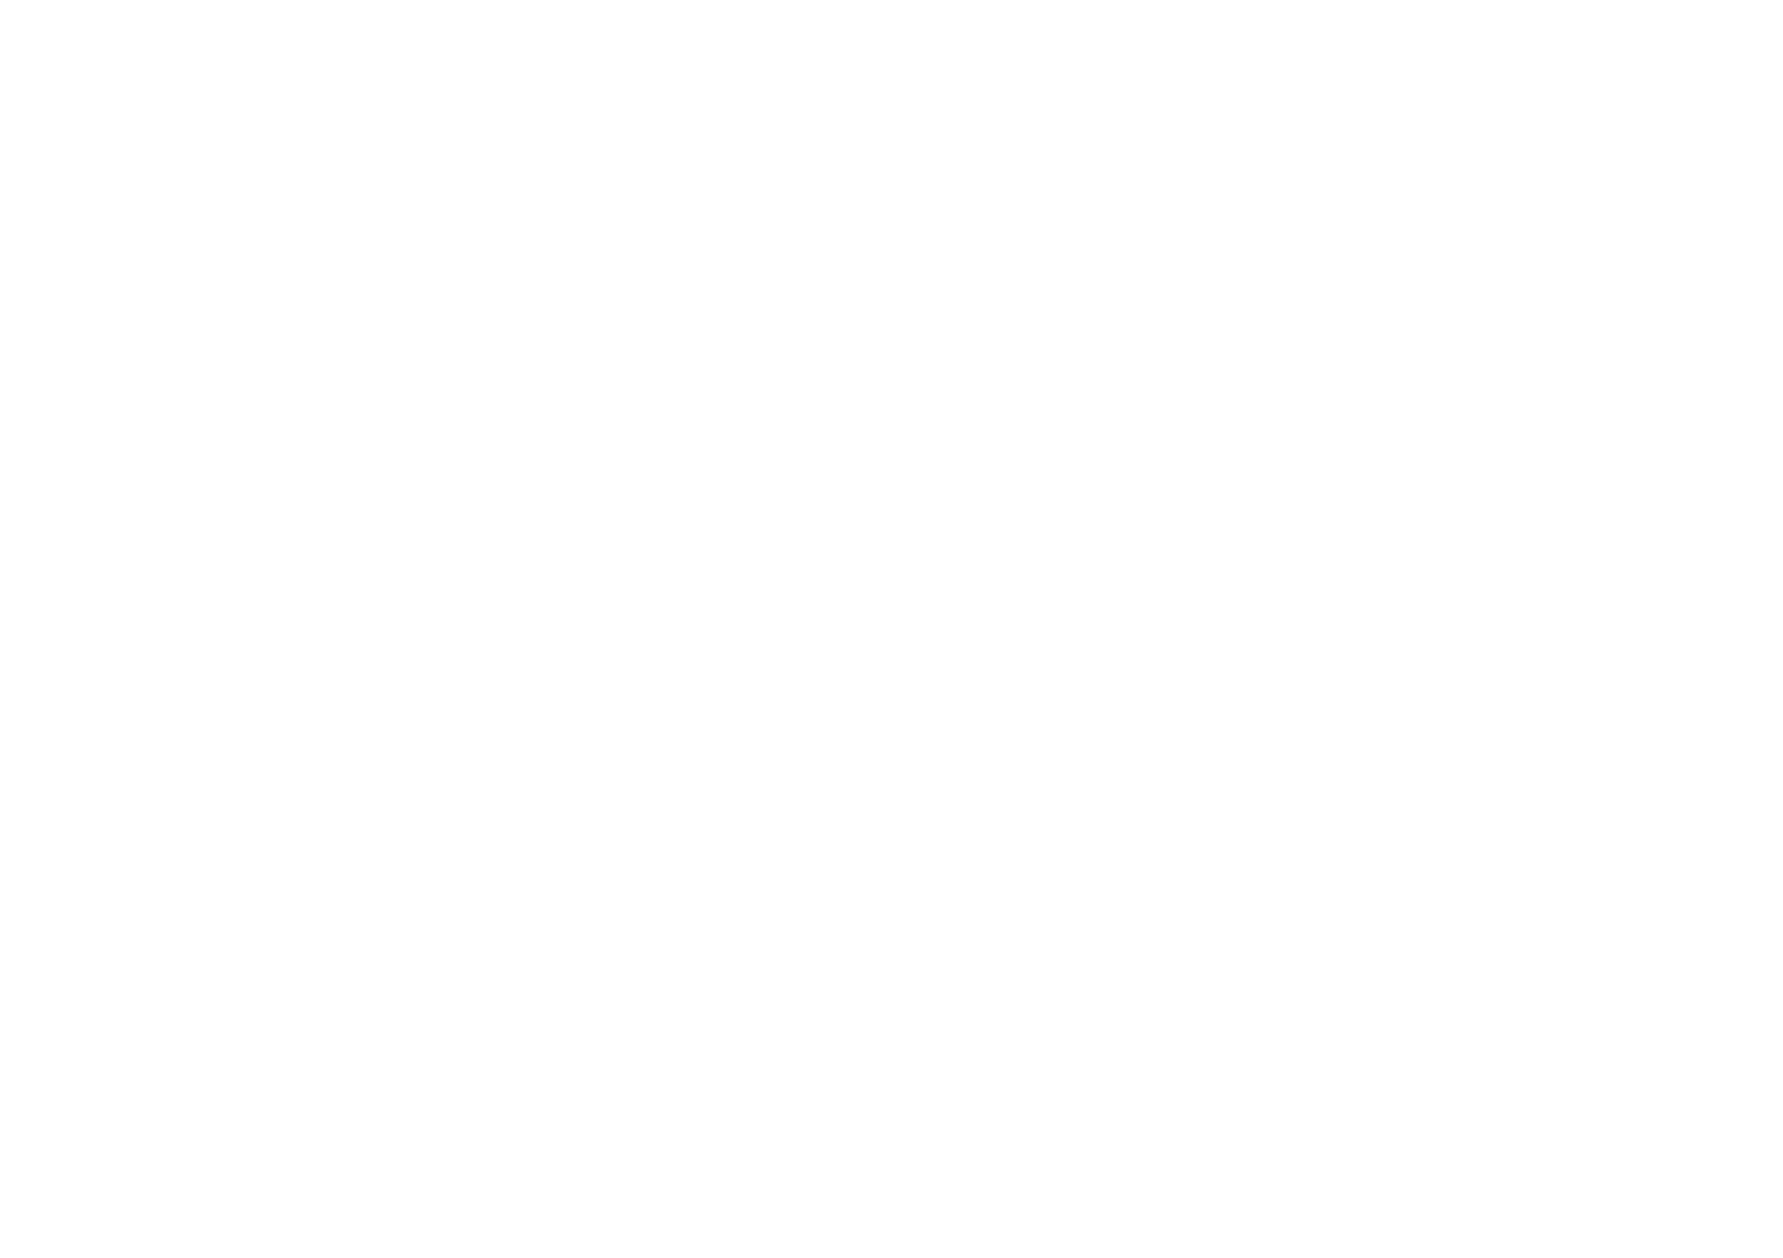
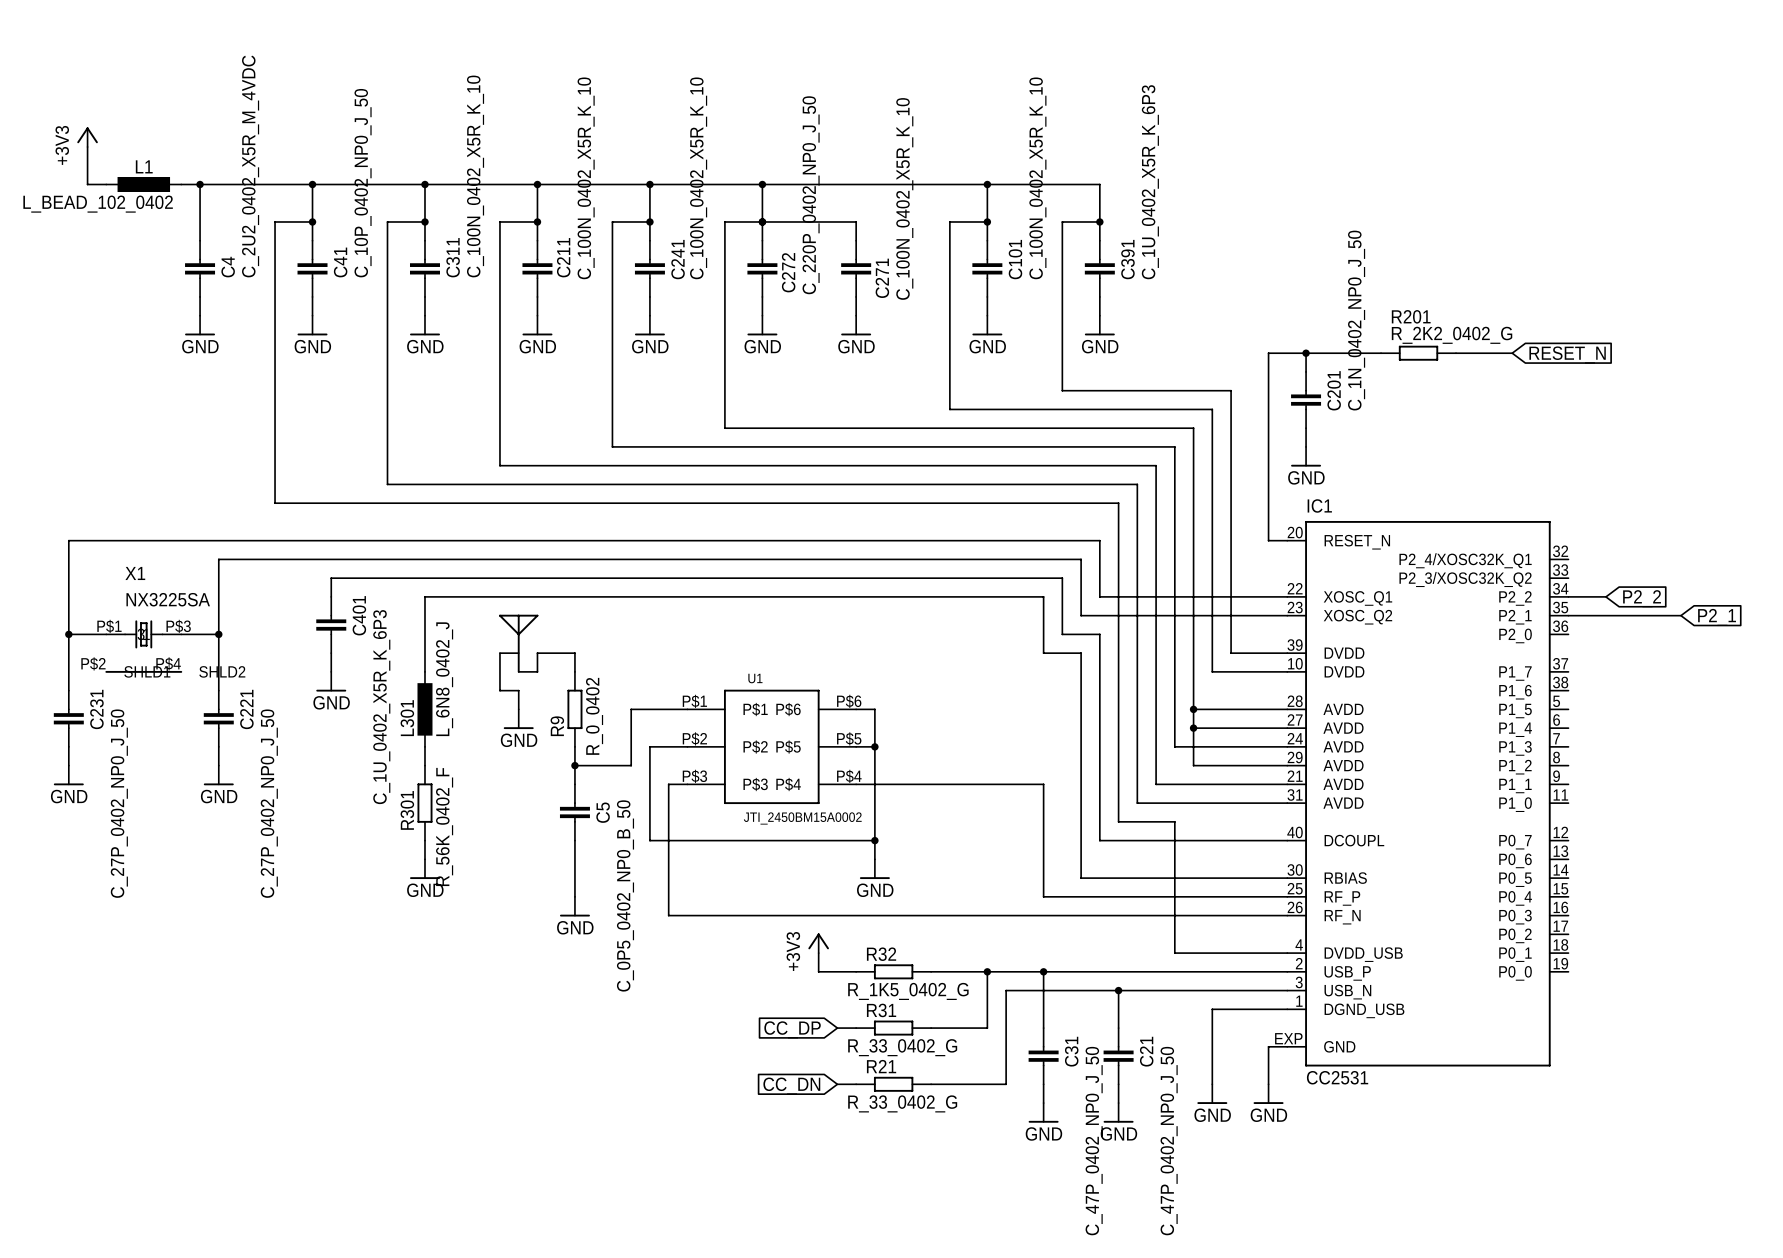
power symbol: none -> +3V3 (87, 137)
wire: none -> (87, 147) (87, 184) (106, 184)
L1: none -> L_BEAD_102_0402 (143, 184)
wire: none -> (181, 184) (1099, 184) (1099, 240)
wire: none -> (200, 184) (200, 240)
junction: none -> (200, 184)
wire: none -> (312, 184) (312, 240)
junction: none -> (312, 184)
wire: none -> (424, 184) (424, 240)
junction: none -> (424, 184)
wire: none -> (537, 184) (537, 240)
junction: none -> (537, 184)
wire: none -> (649, 184) (649, 240)
junction: none -> (649, 184)
wire: none -> (762, 184) (762, 240)
junction: none -> (762, 184)
wire: none -> (987, 184) (987, 240)
junction: none -> (987, 184)
wire: none -> (312, 221) (275, 221) (275, 503) (1118, 503) (1118, 821) (1174, 821) (1174, 953) (1287, 953)
junction: none -> (312, 221)
wire: none -> (424, 221) (387, 221) (387, 484) (1137, 484) (1137, 803) (1287, 803)
junction: none -> (424, 221)
wire: none -> (537, 221) (499, 221) (499, 465) (1156, 465) (1156, 784) (1287, 784)
junction: none -> (537, 221)
wire: none -> (649, 221) (612, 221) (612, 446) (1174, 446) (1174, 746) (1287, 746)
junction: none -> (649, 221)
junction: none -> (762, 221)
wire: none -> (987, 221) (949, 221) (949, 409) (1212, 409) (1212, 671) (1287, 671)
junction: none -> (987, 221)
wire: none -> (1099, 221) (1062, 221) (1062, 390) (1231, 390) (1231, 653) (1287, 653)
junction: none -> (1099, 221)
wire: none -> (856, 240) (856, 221) (724, 221) (724, 428) (1193, 428) (1193, 765) (1287, 765)
C4: none -> C_2U2_0402_X5R_M_4VDC (200, 268)
C41: none -> C_10P_0402_NP0_J_50 (312, 268)
C311: none -> C_100N_0402_X5R_K_10 (424, 268)
C211: none -> C_100N_0402_X5R_K_10 (537, 268)
C241: none -> C_100N_0402_X5R_K_10 (649, 268)
C272: none -> C_220P_0402_NP0_J_50 (762, 268)
C271: none -> C_100N_0402_X5R_K_10 (856, 268)
C101: none -> C_100N_0402_X5R_K_10 (987, 268)
C391: none -> C_1U_0402_X5R_K_6P3 (1099, 268)
wire: none -> (200, 296) (200, 315)
wire: none -> (312, 296) (312, 315)
wire: none -> (424, 296) (424, 315)
wire: none -> (537, 296) (537, 315)
wire: none -> (649, 296) (649, 315)
wire: none -> (762, 296) (762, 315)
wire: none -> (856, 296) (856, 315)
wire: none -> (987, 296) (987, 315)
wire: none -> (1099, 296) (1099, 315)
power symbol: none -> GND (200, 325)
power symbol: none -> GND (312, 325)
power symbol: none -> GND (424, 325)
power symbol: none -> GND (537, 325)
power symbol: none -> GND (649, 325)
power symbol: none -> GND (762, 325)
power symbol: none -> GND (856, 325)
power symbol: none -> GND (987, 325)
power symbol: none -> GND (1099, 325)
wire: none -> (1306, 353) (1306, 371)
junction: none -> (1306, 353)
wire: none -> (1381, 353) (1268, 353) (1268, 540) (1287, 540)
R201: none -> R_2K2_0402_G (1418, 353)
wire: none -> (1456, 353) (1512, 353)
global label: none -> RESET_N (1567, 355)
C201: none -> C_1N_0402_NP0_J_50 (1306, 400)
wire: none -> (1306, 428) (1306, 446)
power symbol: none -> GND (1306, 456)
wire: none -> (331, 596) (331, 578) (1062, 578) (1062, 634) (1099, 634) (1099, 840) (1287, 840)
wire: none -> (1287, 596) (1099, 596) (1099, 540) (68, 540) (68, 690)
wire: none -> (1568, 596) (1605, 596)
global label: none -> P2_2 (1642, 598)
wire: none -> (1287, 615) (1081, 615) (1081, 559) (218, 559) (218, 690)
wire: none -> (1568, 615) (1680, 615)
global label: none -> P2_1 (1717, 617)
C401: none -> C_1U_0402_X5R_K_6P3 (331, 625)
wire: none -> (68, 634) (106, 634)
junction: none -> (68, 634)
wire: none -> (181, 634) (218, 634)
junction: none -> (218, 634)
part: none -> (518, 643)
X1: none -> NX3225SA (143, 646)
wire: none -> (331, 653) (331, 671)
wire: none -> (499, 653) (499, 690) (518, 690) (518, 709)
wire: none -> (424, 671) (424, 596) (1043, 596) (1043, 653) (1081, 653) (1081, 878) (1287, 878)
wire: none -> (518, 671) (537, 671) (537, 653) (574, 653) (574, 671)
power symbol: none -> GND (331, 681)
L301: none -> L_6N8_0402_J (424, 709)
R9: none -> R_0_0402 (574, 709)
wire: none -> (687, 709) (631, 709) (631, 765) (574, 765)
wire: none -> (856, 709) (874, 709) (874, 859)
wire: none -> (1193, 709) (1287, 709)
junction: none -> (1193, 709)
C231: none -> C_27P_0402_NP0_J_50 (68, 718)
C221: none -> C_27P_0402_NP0_J_50 (218, 718)
power symbol: none -> GND (518, 719)
wire: none -> (1193, 728) (1287, 728)
junction: none -> (1193, 728)
wire: none -> (68, 746) (68, 765)
wire: none -> (218, 746) (218, 765)
wire: none -> (424, 746) (424, 765)
wire: none -> (574, 746) (574, 784)
wire: none -> (687, 746) (649, 746) (649, 840) (874, 840)
U1: none -> JTI_2450BM15A0002 (771, 746)
wire: none -> (856, 746) (874, 746)
junction: none -> (874, 746)
junction: none -> (574, 765)
power symbol: none -> GND (68, 775)
power symbol: none -> GND (218, 775)
wire: none -> (687, 784) (668, 784) (668, 915) (1287, 915)
wire: none -> (856, 784) (1043, 784) (1043, 896) (1287, 896)
IC1: none -> CC2531 (1427, 793)
R301: none -> R_56K_0402_F (424, 803)
C5: none -> C_0P5_0402_NP0_B_50 (574, 812)
wire: none -> (424, 840) (424, 859)
wire: none -> (574, 840) (574, 896)
junction: none -> (874, 840)
power symbol: none -> GND (424, 869)
power symbol: none -> GND (874, 869)
power symbol: none -> GND (574, 906)
power symbol: none -> +3V3 (818, 943)
wire: none -> (818, 953) (818, 971) (856, 971)
R32: none -> R_1K5_0402_G (893, 971)
wire: none -> (931, 971) (1287, 971)
wire: none -> (987, 971) (987, 1028) (931, 1028)
junction: none -> (987, 971)
wire: none -> (1043, 971) (1043, 1028)
junction: none -> (1043, 971)
wire: none -> (1118, 990) (1118, 1028)
junction: none -> (1118, 990)
wire: none -> (1287, 990) (1006, 990) (1006, 1084) (931, 1084)
wire: none -> (1287, 1009) (1212, 1009) (1212, 1084)
wire: none -> (837, 1028) (856, 1028)
R31: none -> R_33_0402_G (893, 1028)
global label: none -> CC_DP (792, 1029)
wire: none -> (1287, 1046) (1268, 1046) (1268, 1084)
C31: none -> C_47P_0402_NP0_J_50 (1043, 1056)
C21: none -> C_47P_0402_NP0_J_50 (1118, 1056)
wire: none -> (837, 1084) (856, 1084)
R21: none -> R_33_0402_G (893, 1084)
wire: none -> (1043, 1084) (1043, 1103)
wire: none -> (1118, 1084) (1118, 1103)
global label: none -> CC_DN (791, 1086)
power symbol: none -> GND (1212, 1094)
power symbol: none -> GND (1268, 1094)
power symbol: none -> GND (1043, 1112)
power symbol: none -> GND (1118, 1112)

